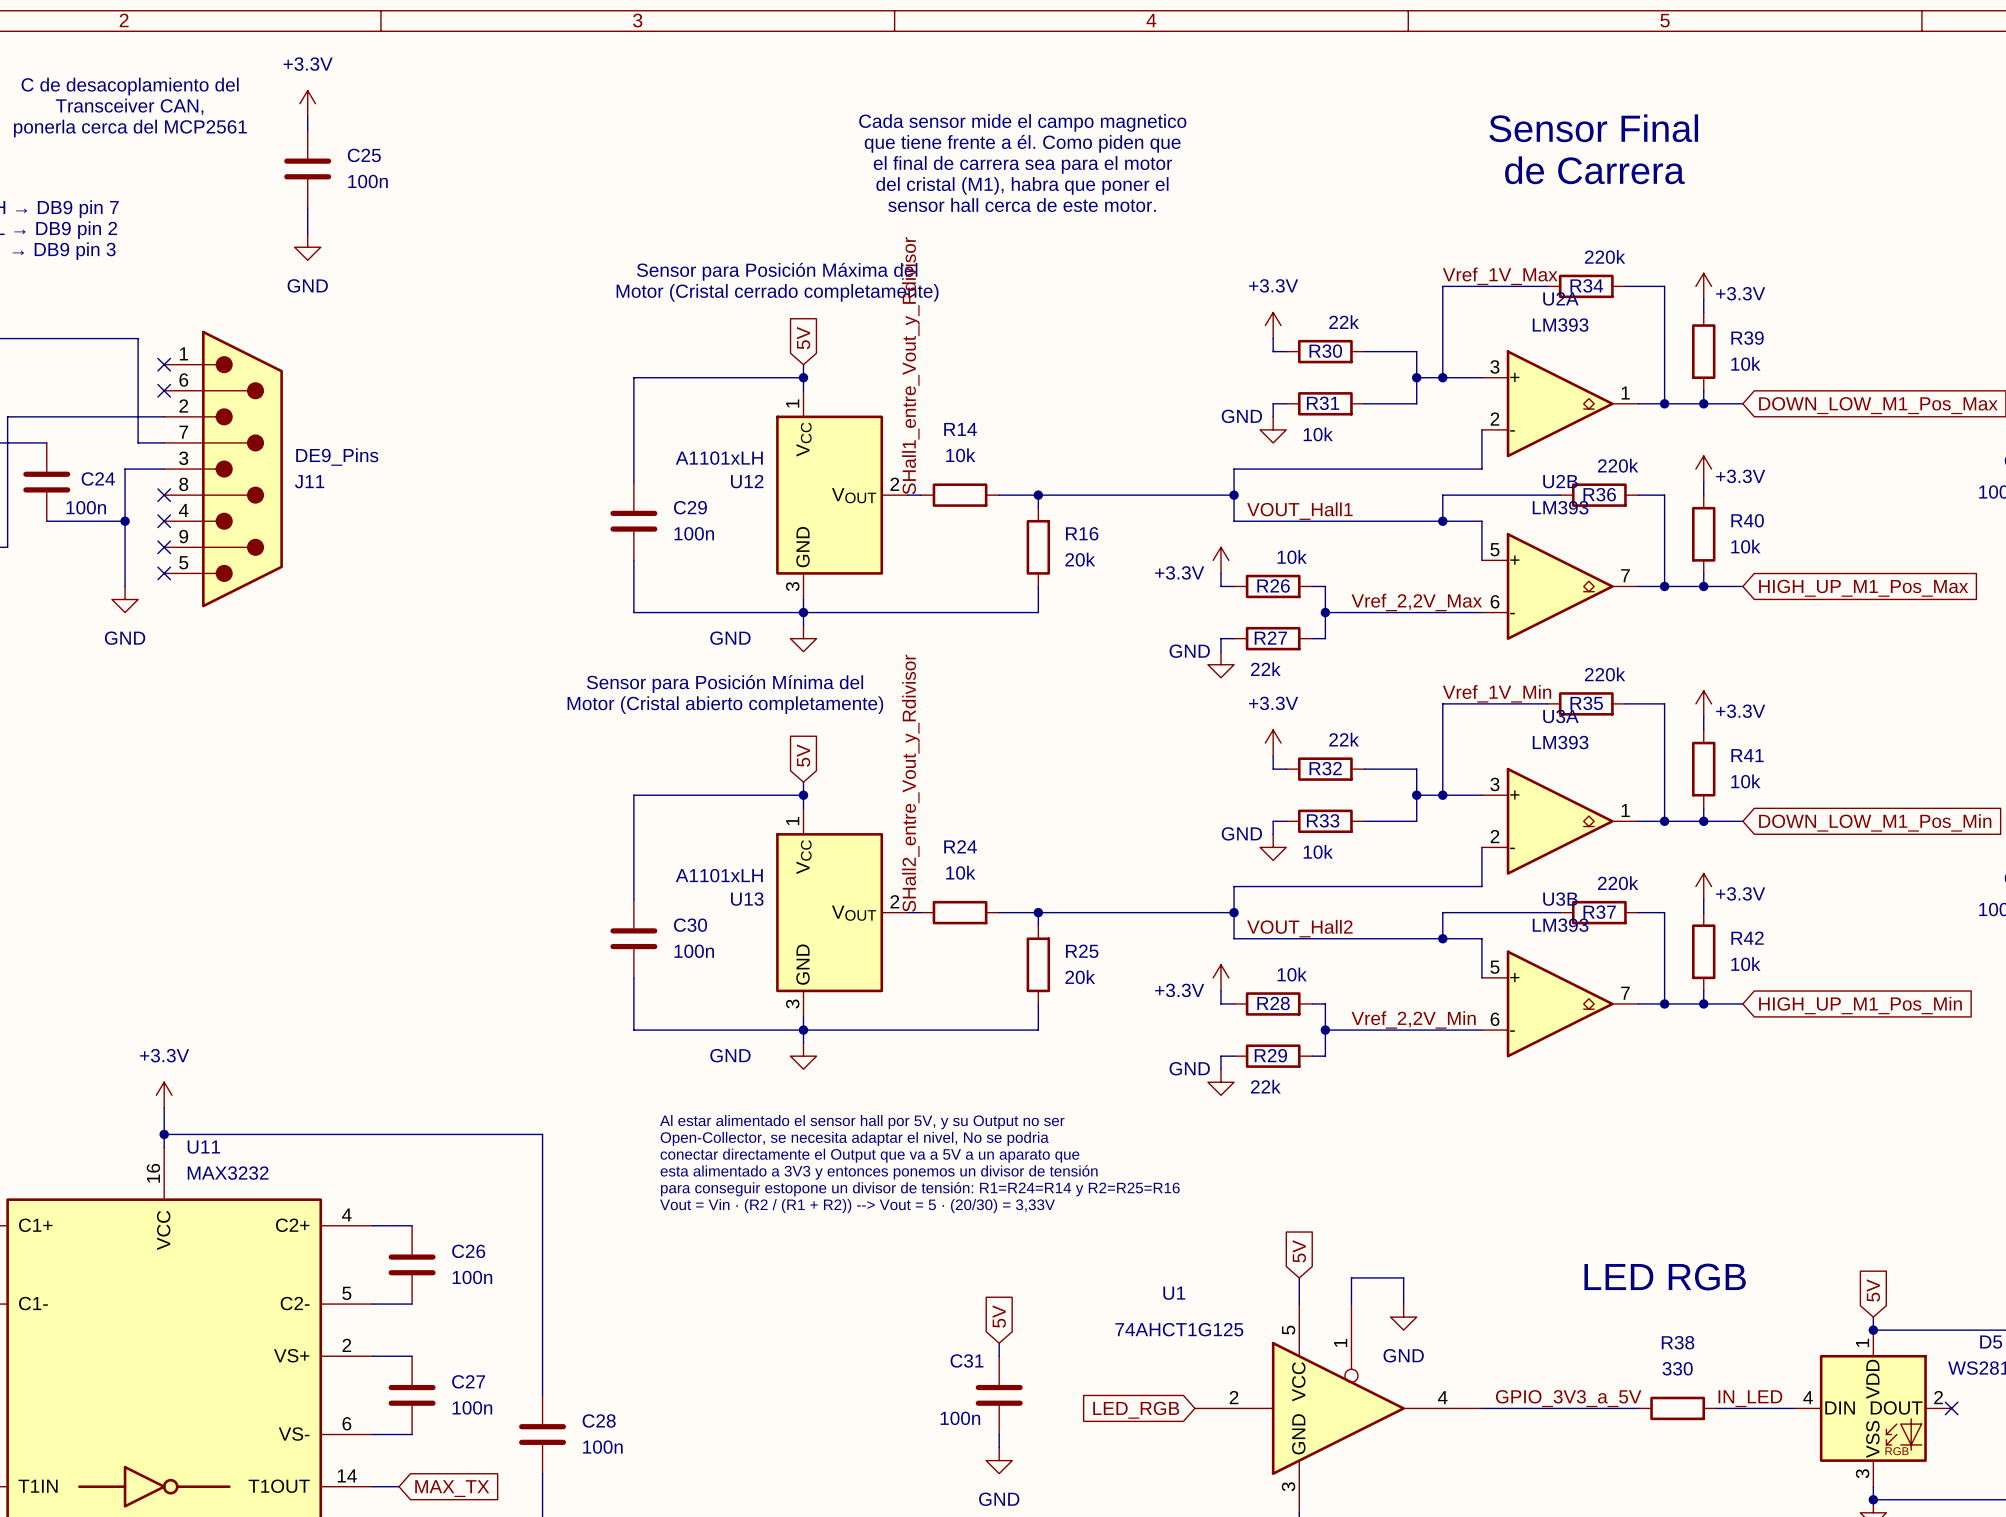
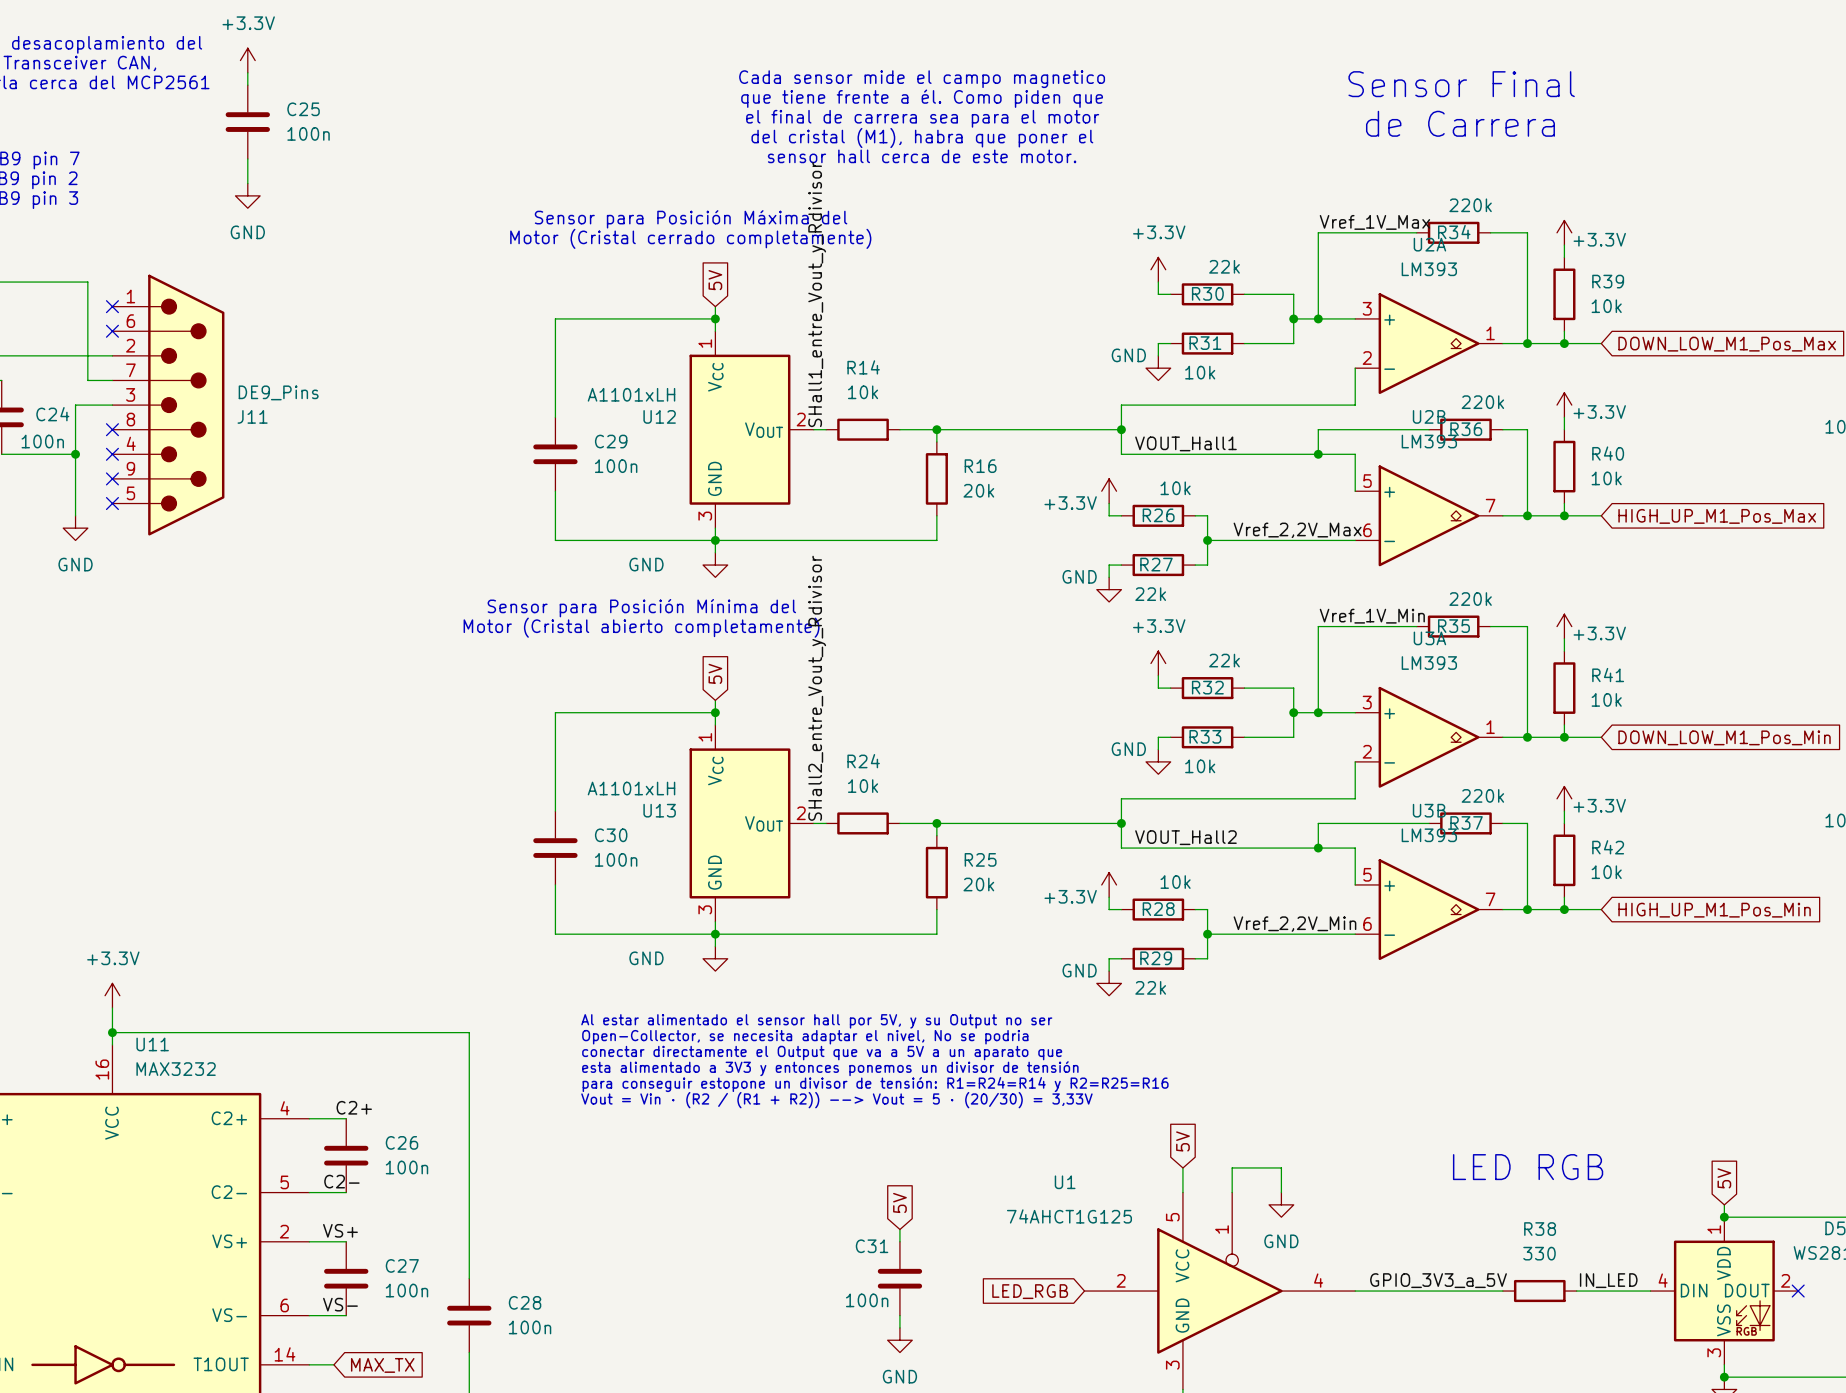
label: none -> C2+ (354, 1107)
label: none -> C2- (341, 1181)
label: none -> VS+ (340, 1230)
label: none -> VS- (340, 1304)

